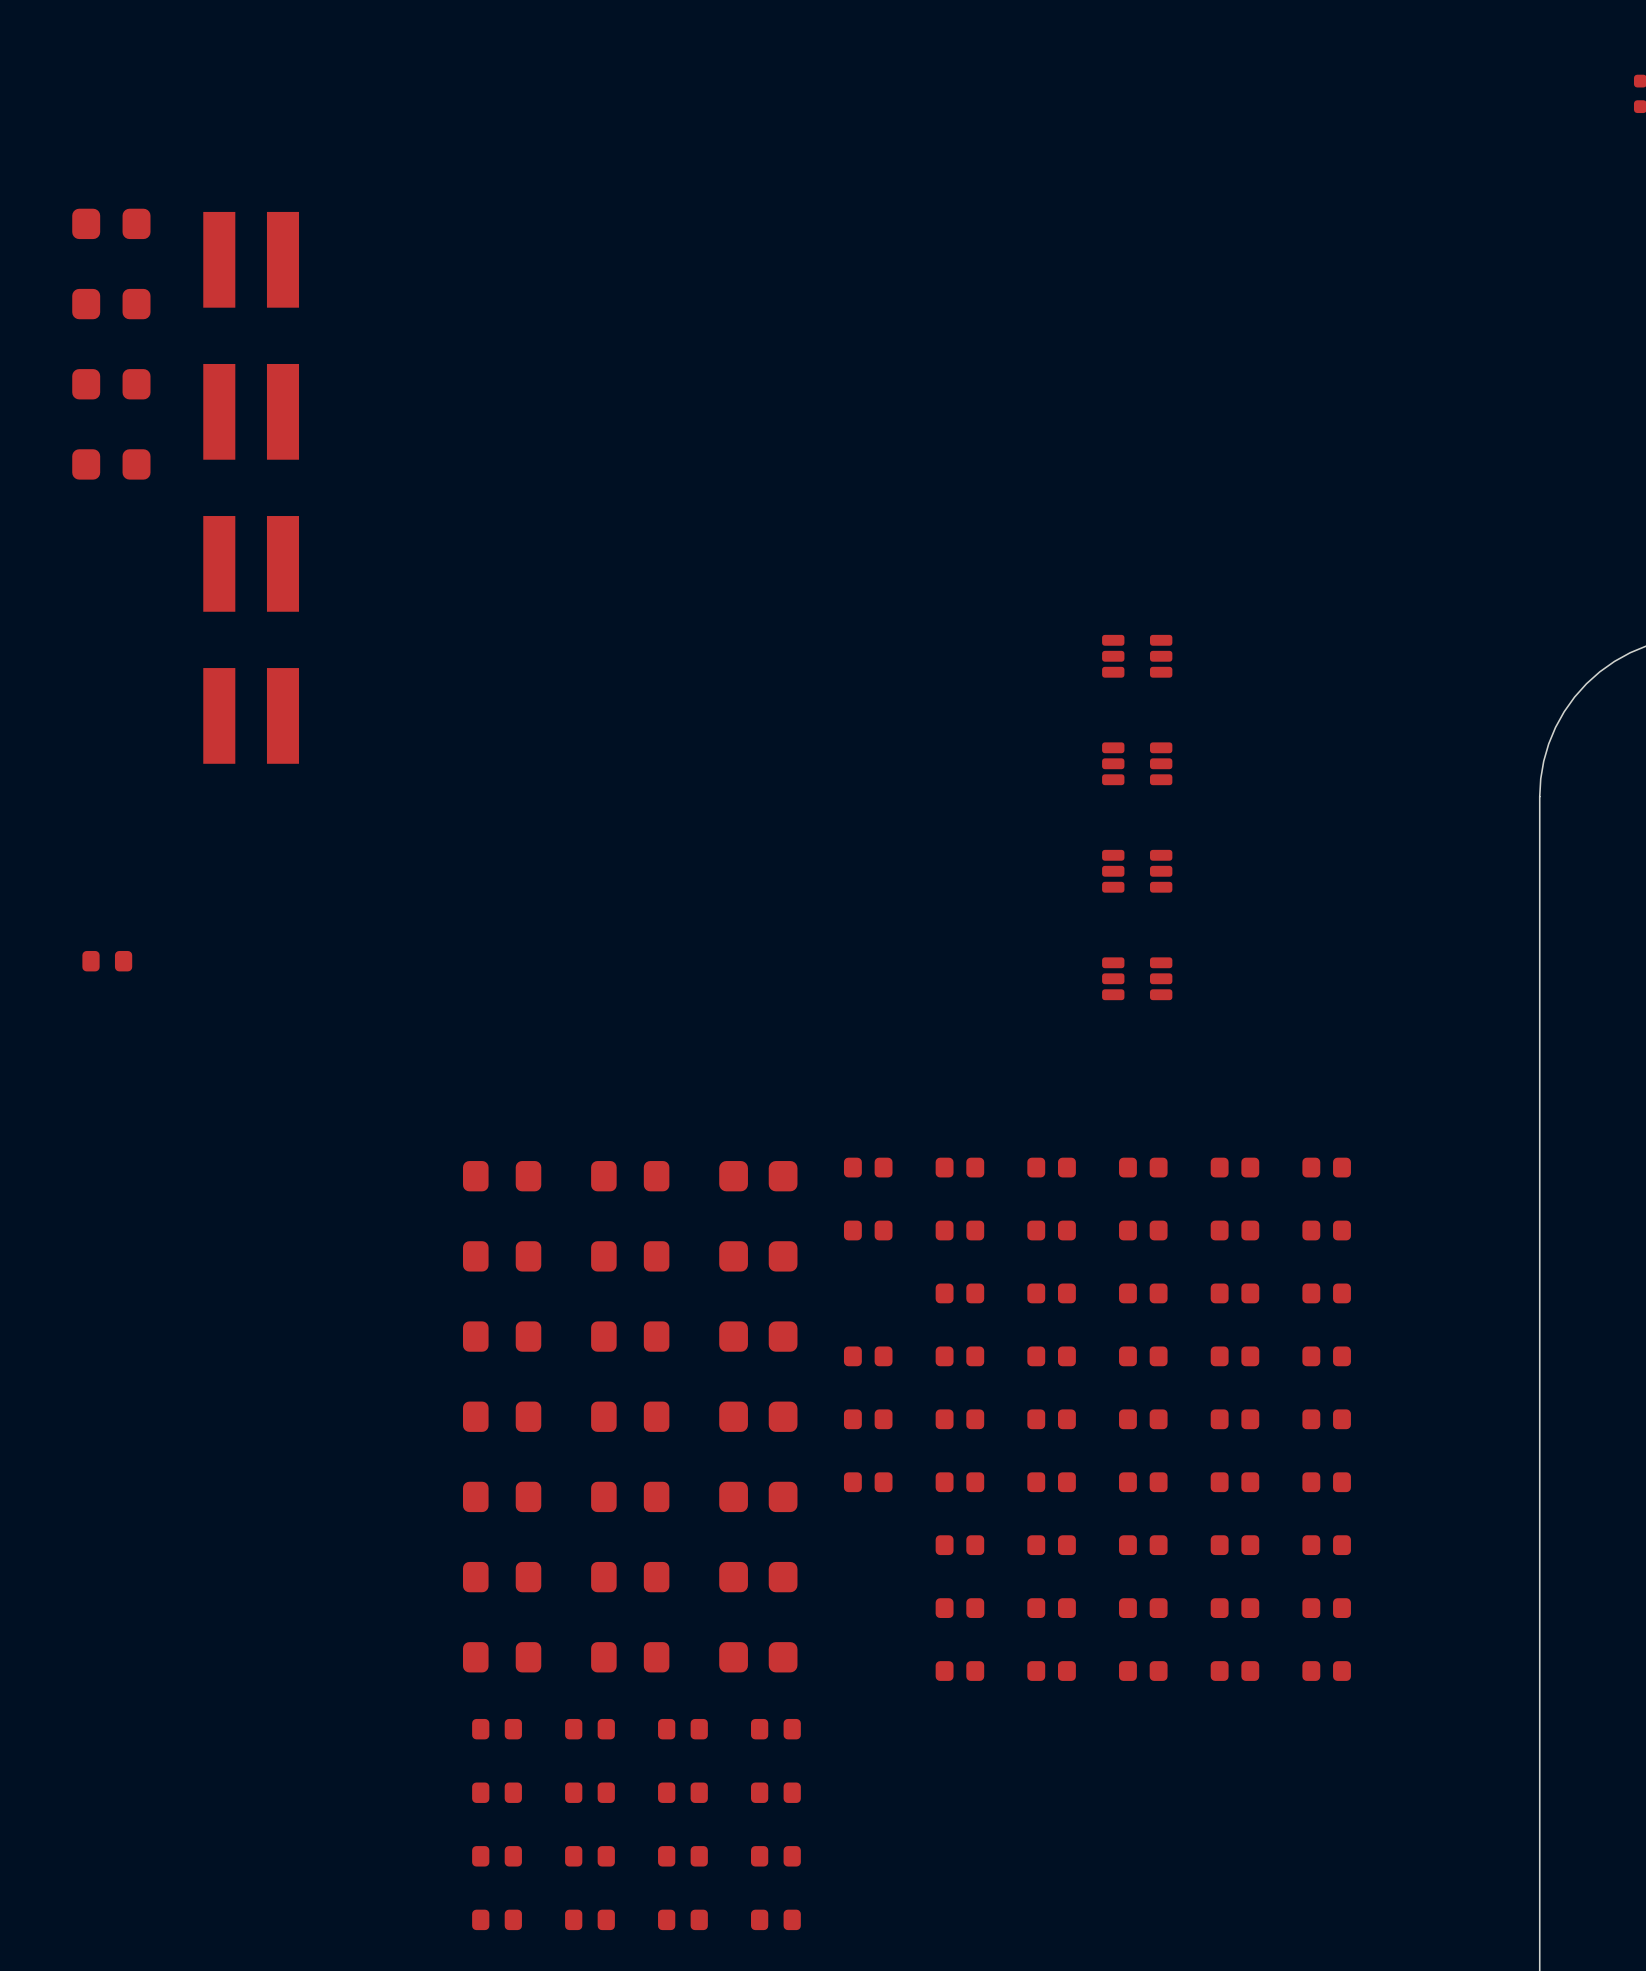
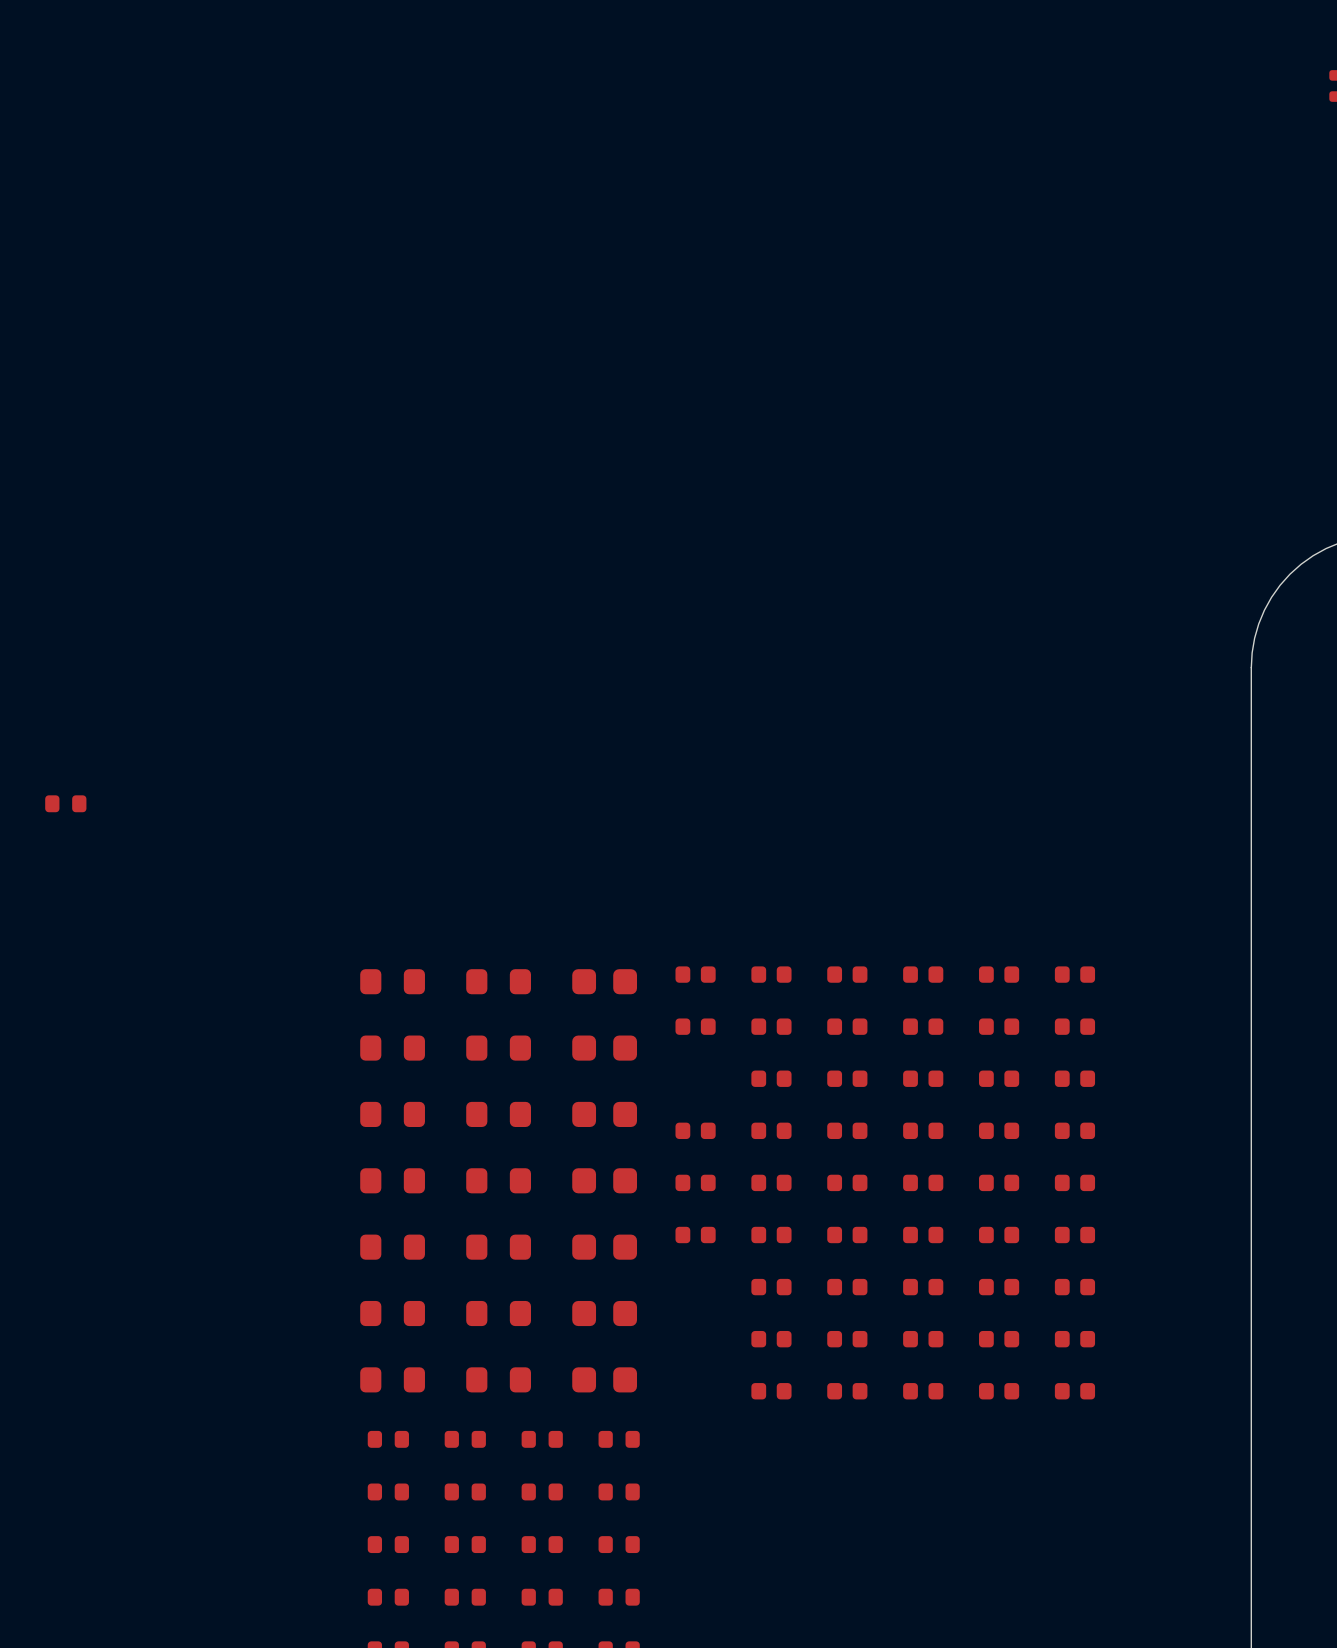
part: (111, 223) -> none
part: (251, 259) -> none
part: (111, 304) -> none
part: (111, 384) -> none
part: (251, 411) -> none
part: (111, 464) -> none
part: (251, 563) -> none
part: (1137, 656) -> none
part: (251, 715) -> none
part: (1137, 763) -> none
part: (1137, 871) -> none
part: (1137, 978) -> none

